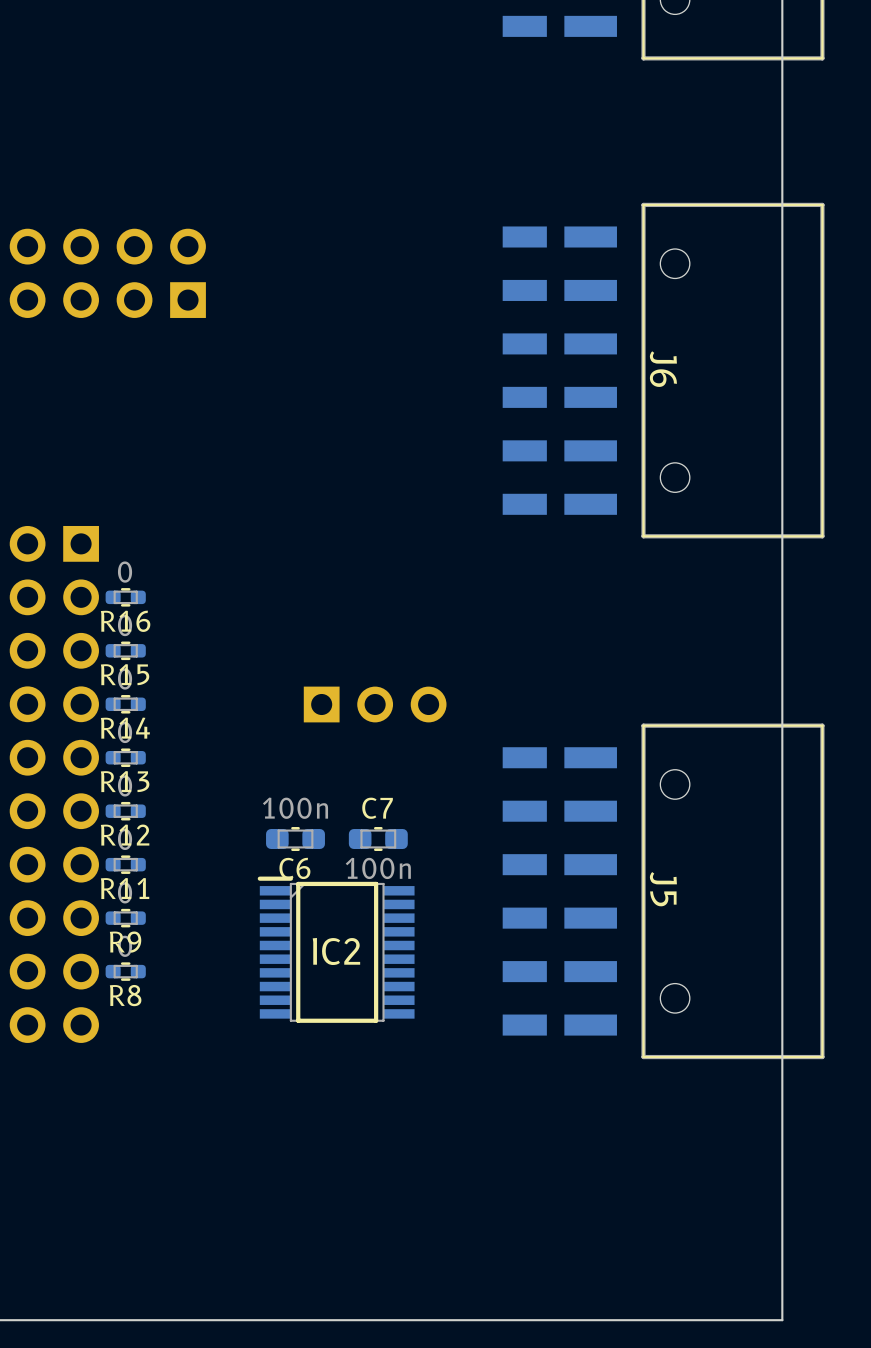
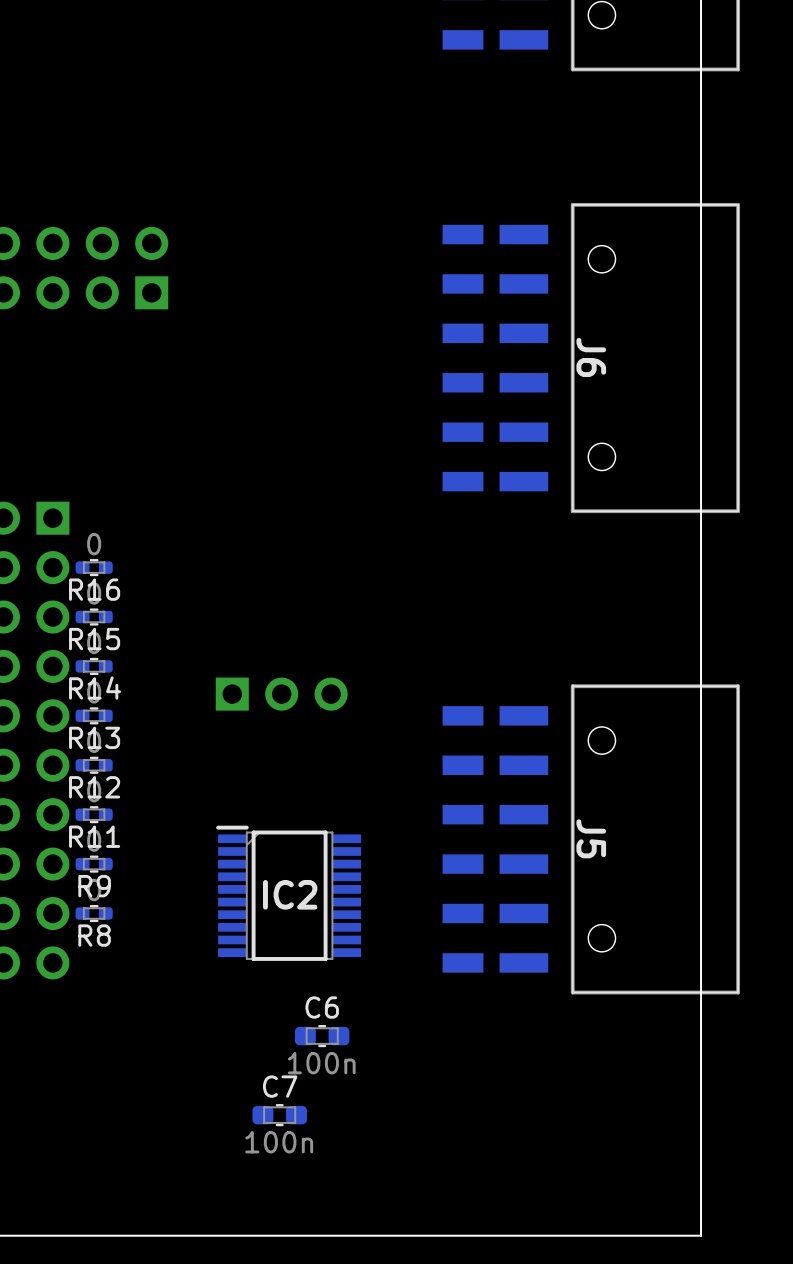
part position: (375, 704) -> (281, 694)
C6 value position: 100n (295, 808) -> 100n (321, 1063)
C6 position: (295, 839) -> (322, 1036)
C7 position: (378, 839) -> (279, 1115)
C6 name position: C6 (294, 868) -> C6 (322, 1007)

